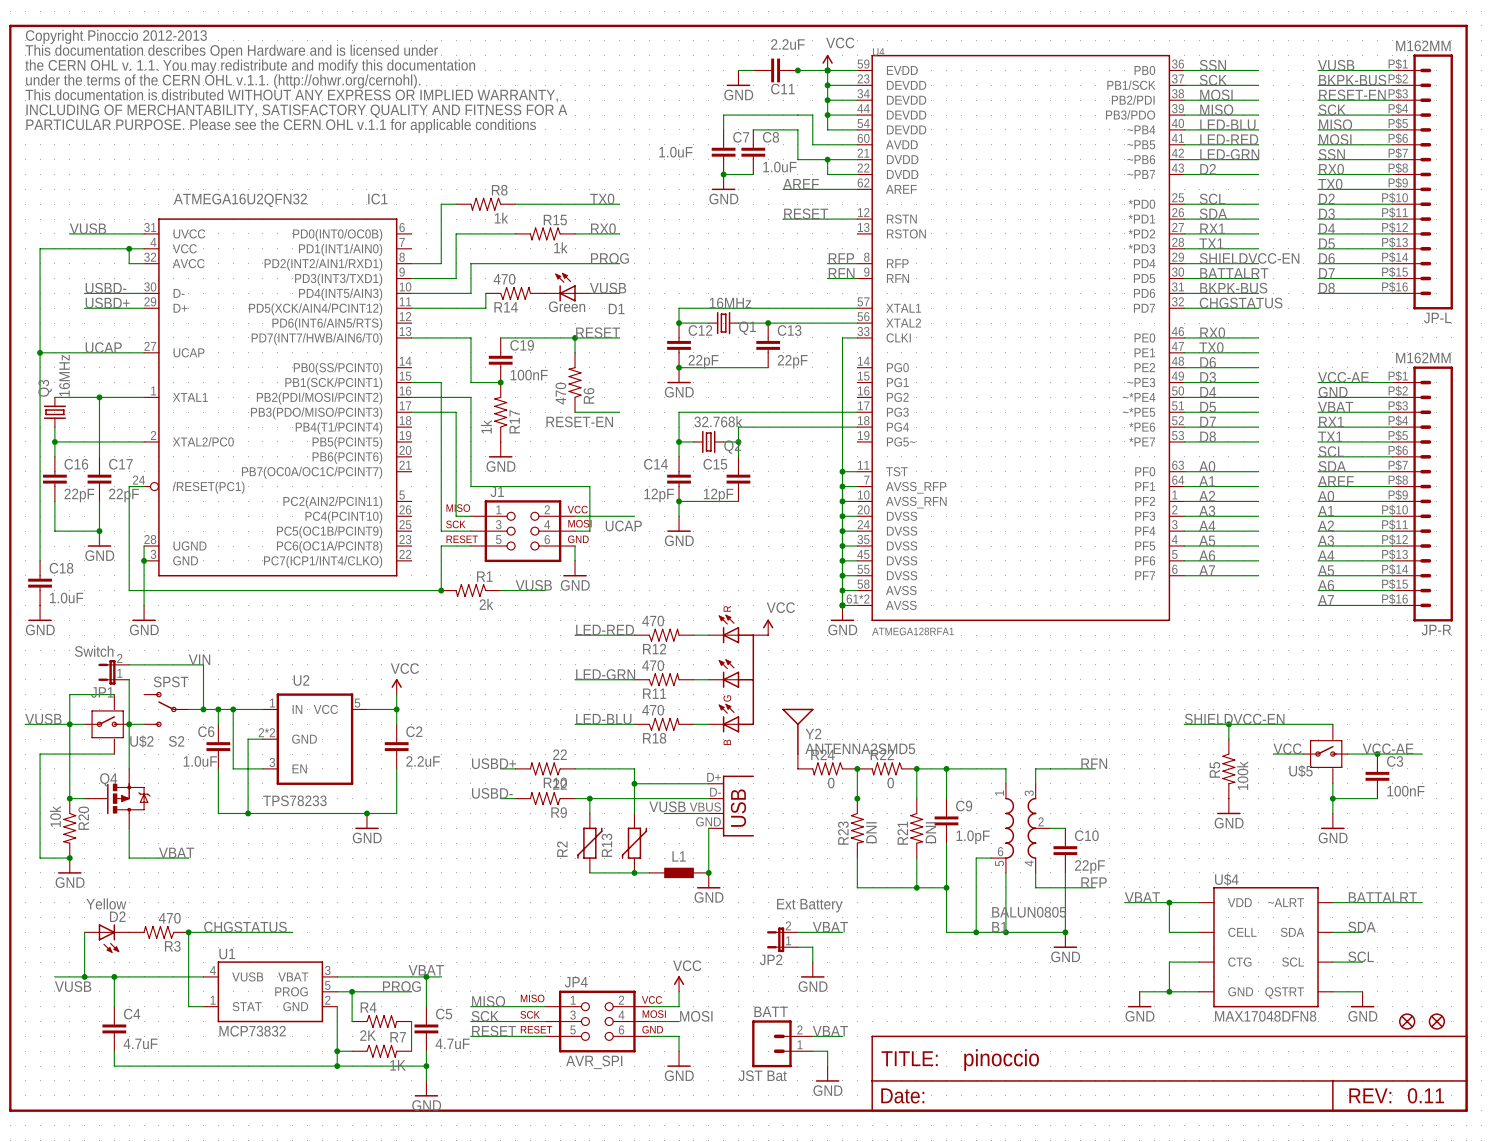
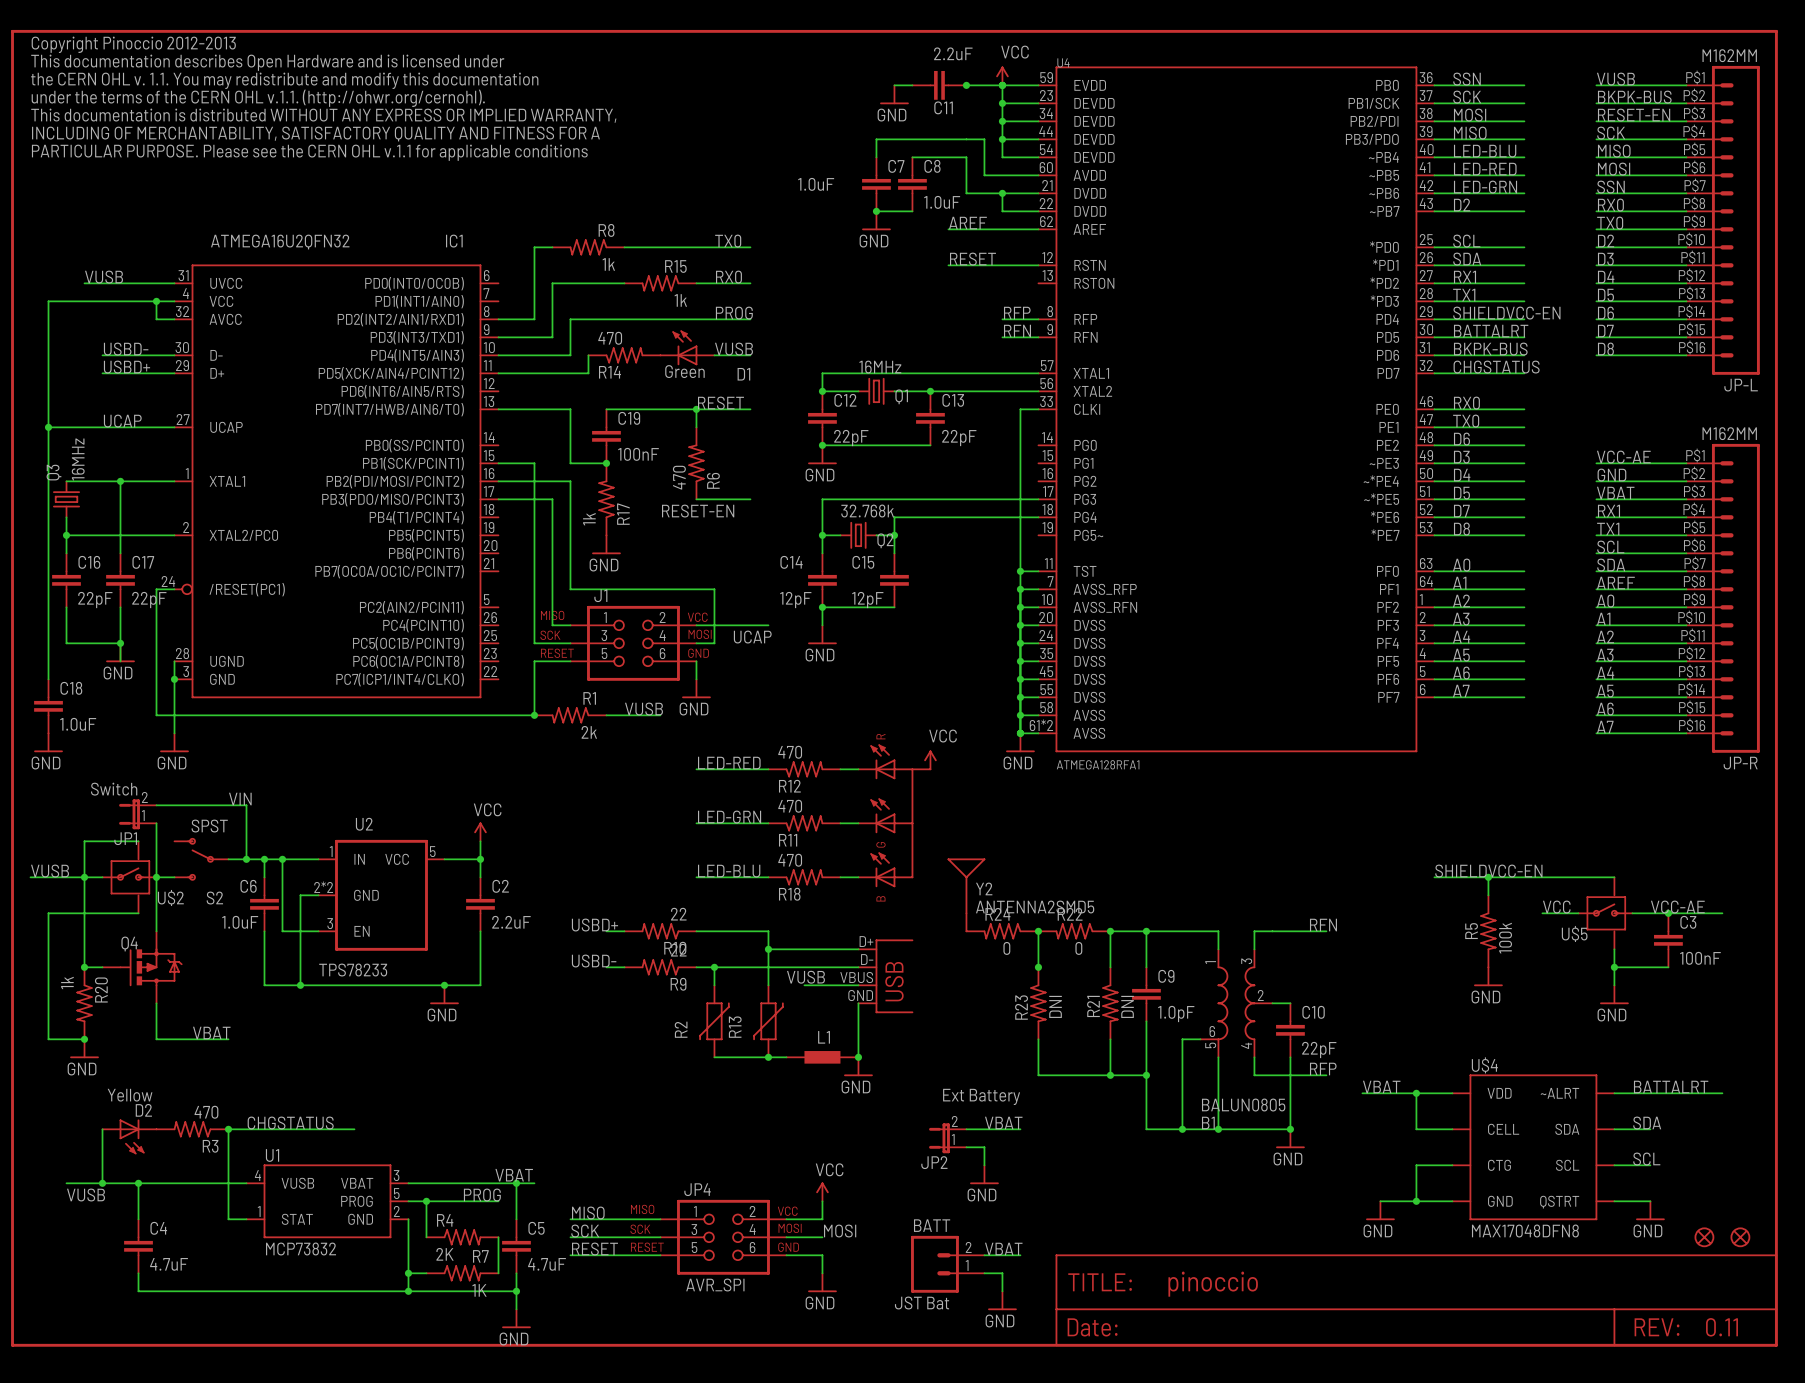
R20 value: 10k (55, 816) -> 1k (67, 982)

